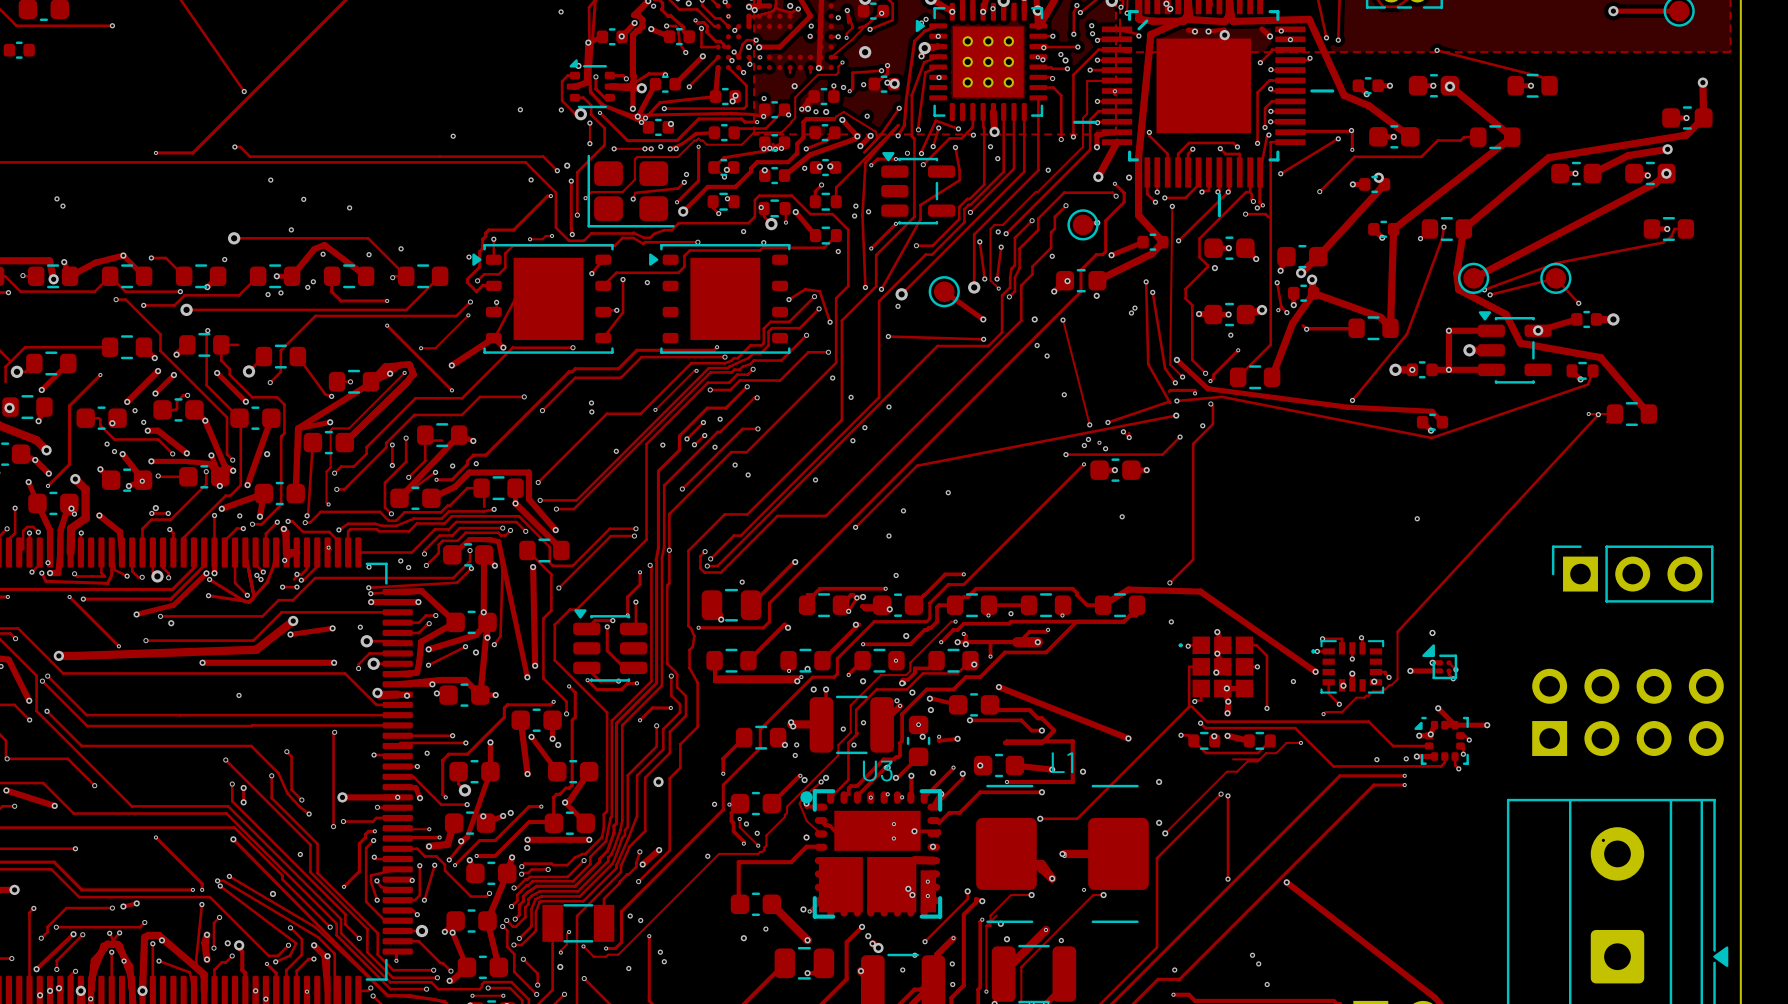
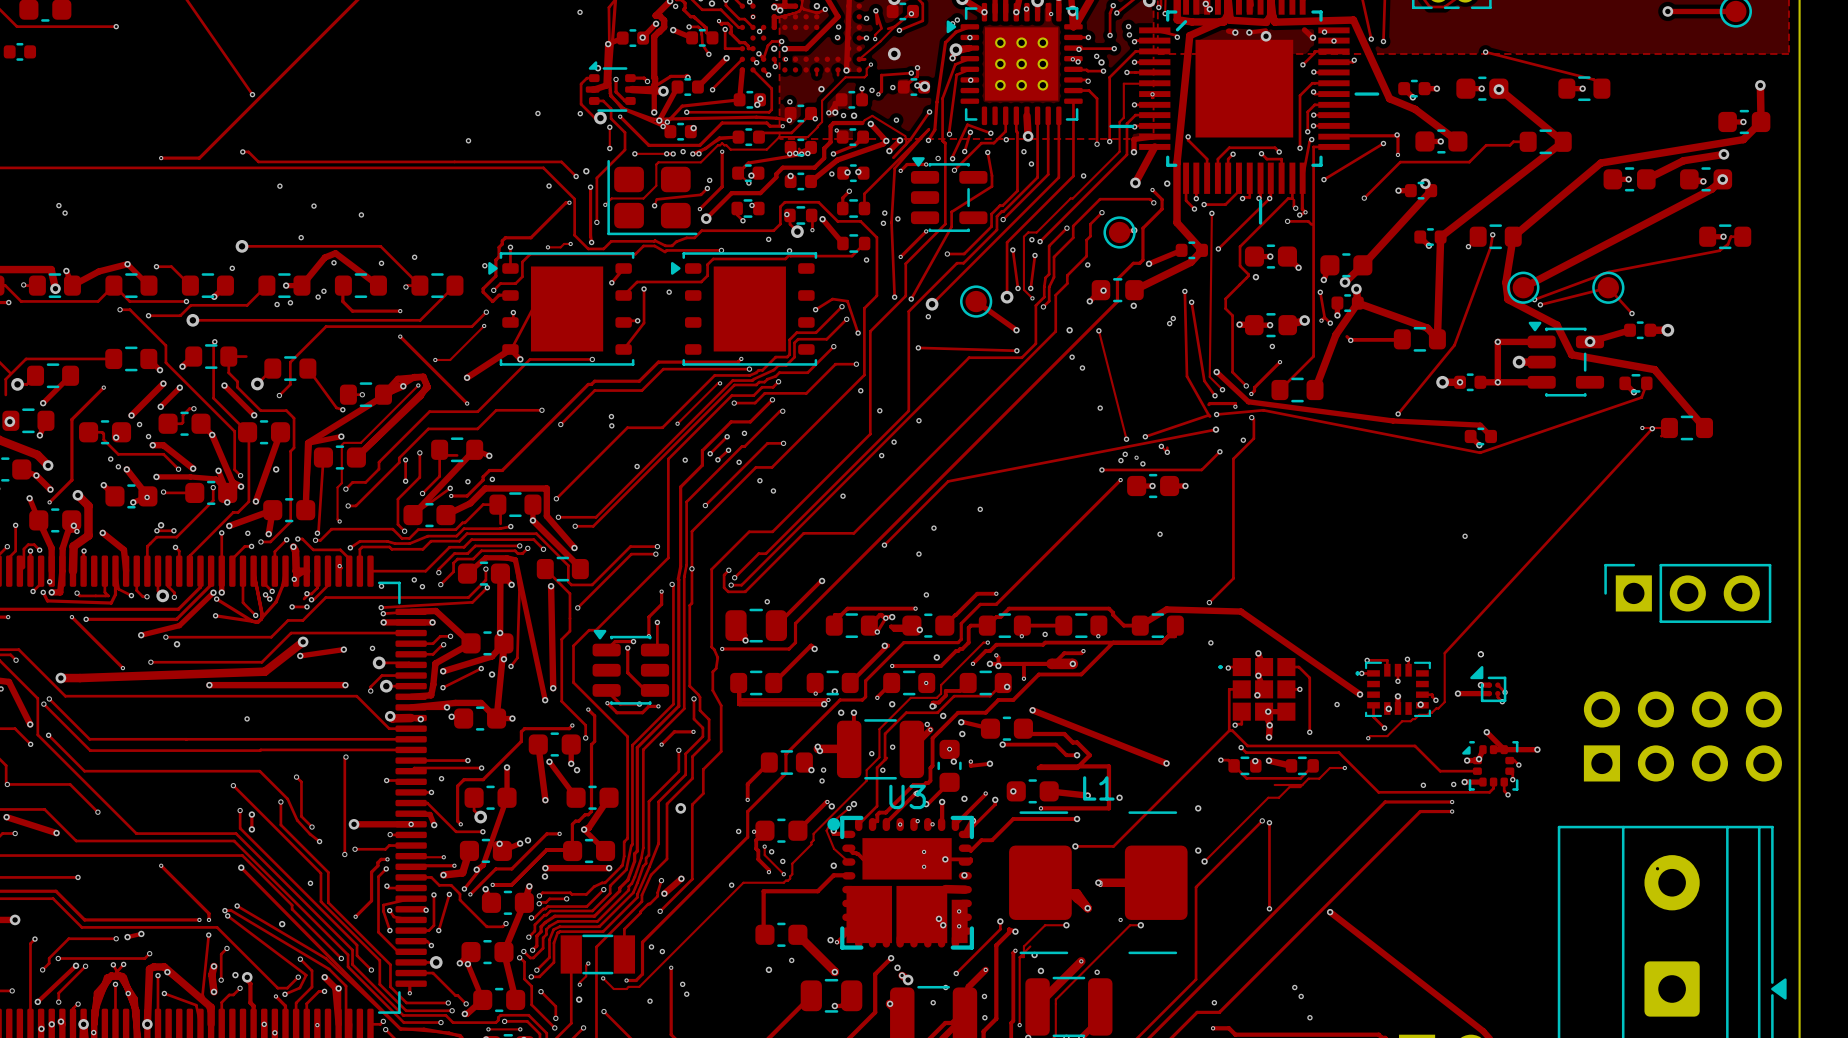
via: none -> (1051, 14)
via: none -> (836, 130)

